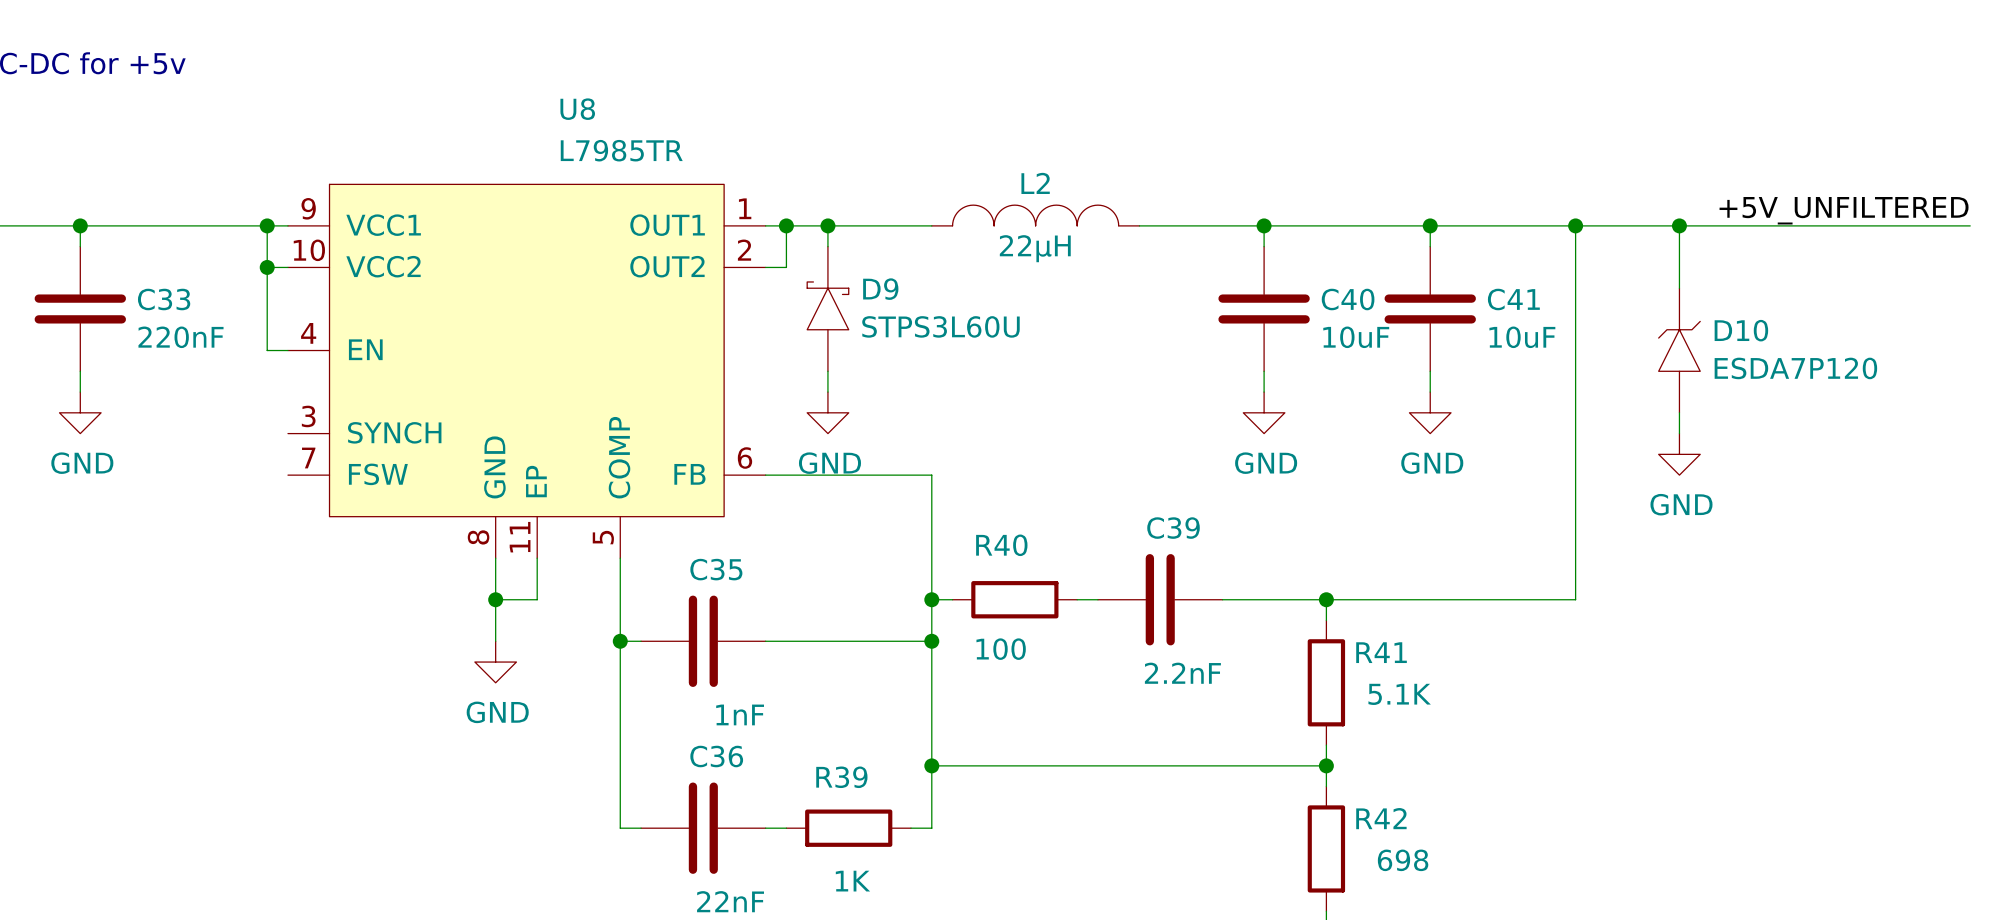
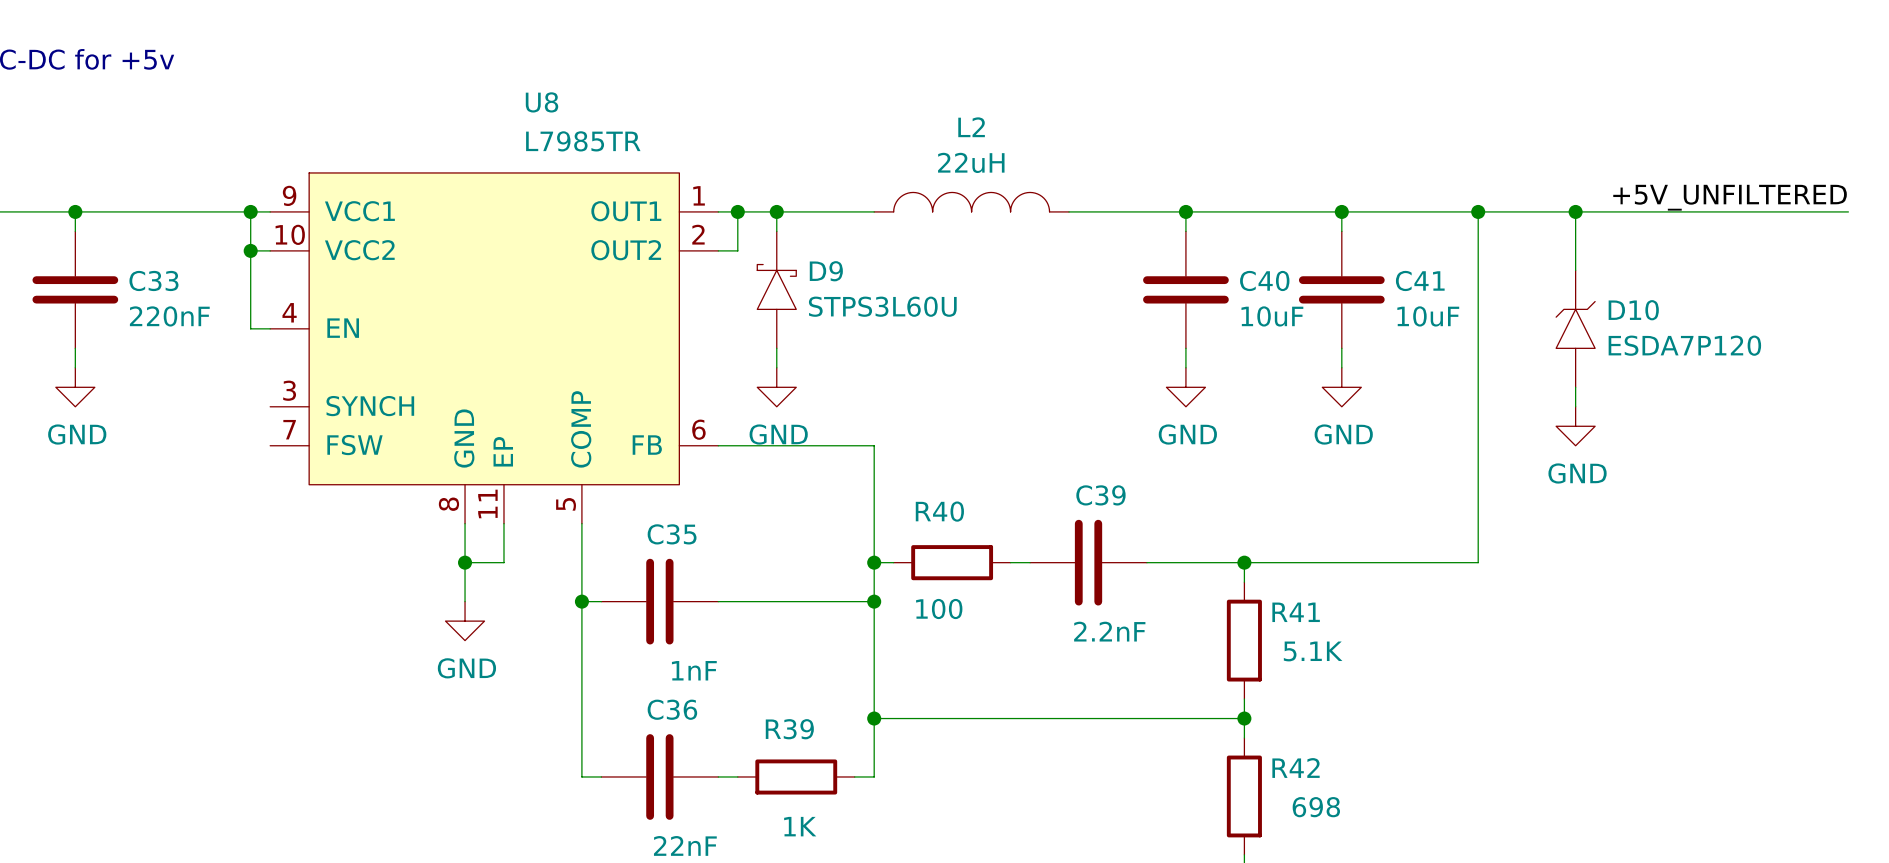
L2 value: none -> 22uH (971, 162)
L2 name position: L2 (1035, 183) -> L2 (971, 127)
L2 text: 22µH (1035, 248) -> none

